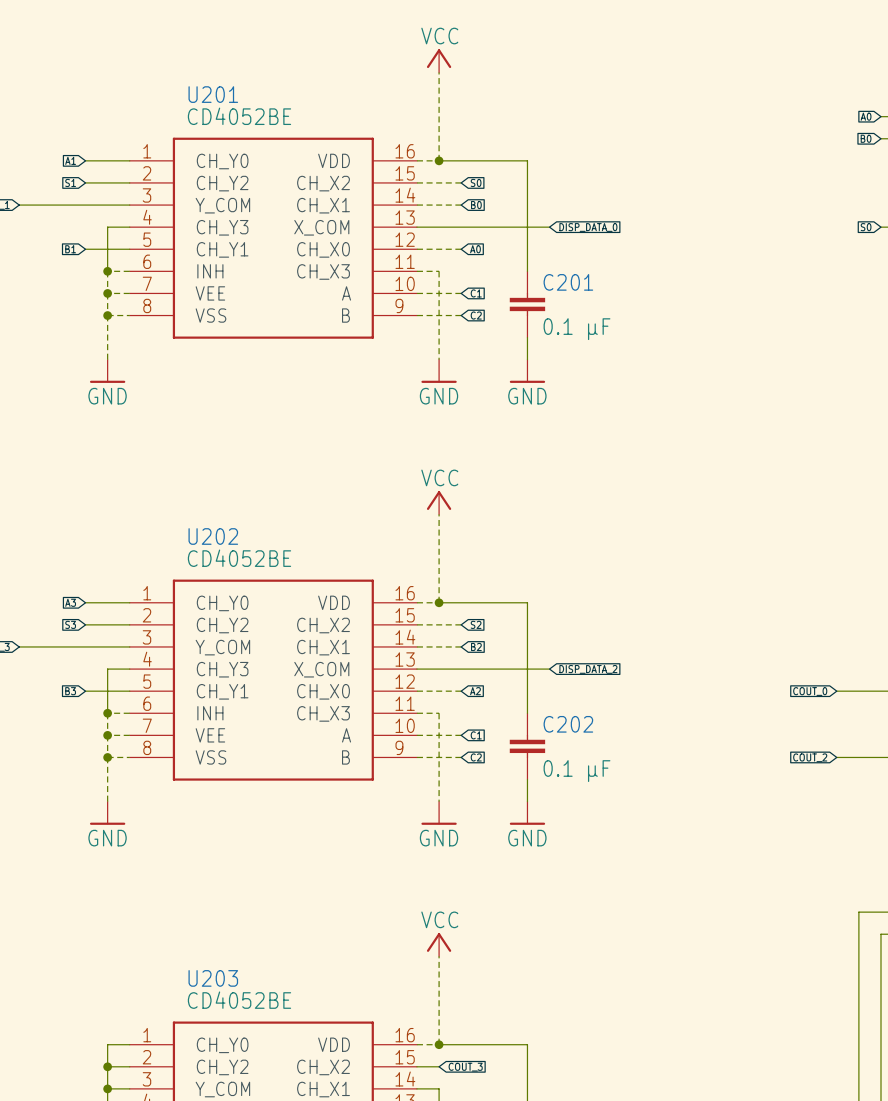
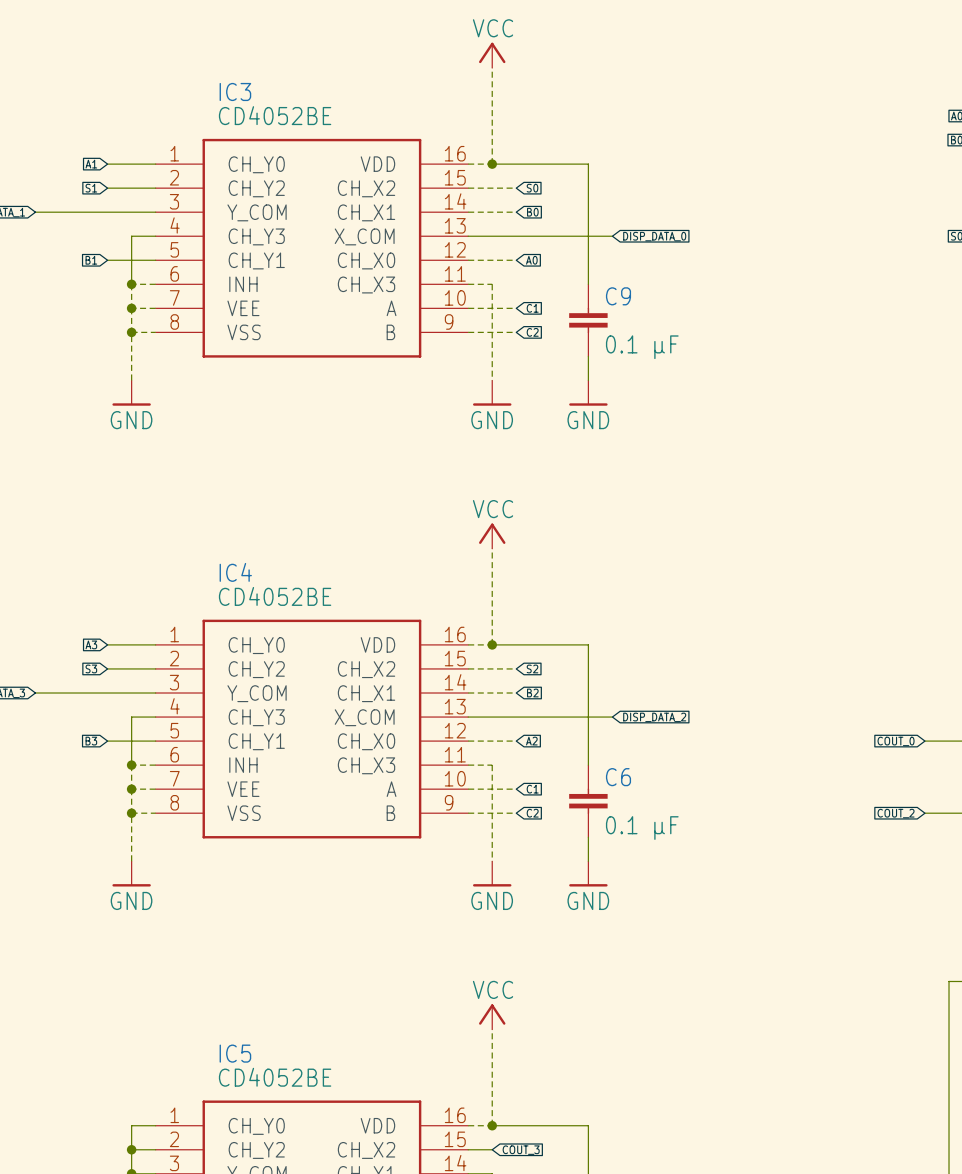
U201 name: U201 (213, 94) -> IC3 (235, 91)
C201 name: C201 (568, 282) -> C9 (618, 296)
U202 name: U202 (213, 536) -> IC4 (235, 572)
C202 name: C202 (568, 724) -> C6 (618, 777)
U203 name: U203 (213, 978) -> IC5 (235, 1053)

